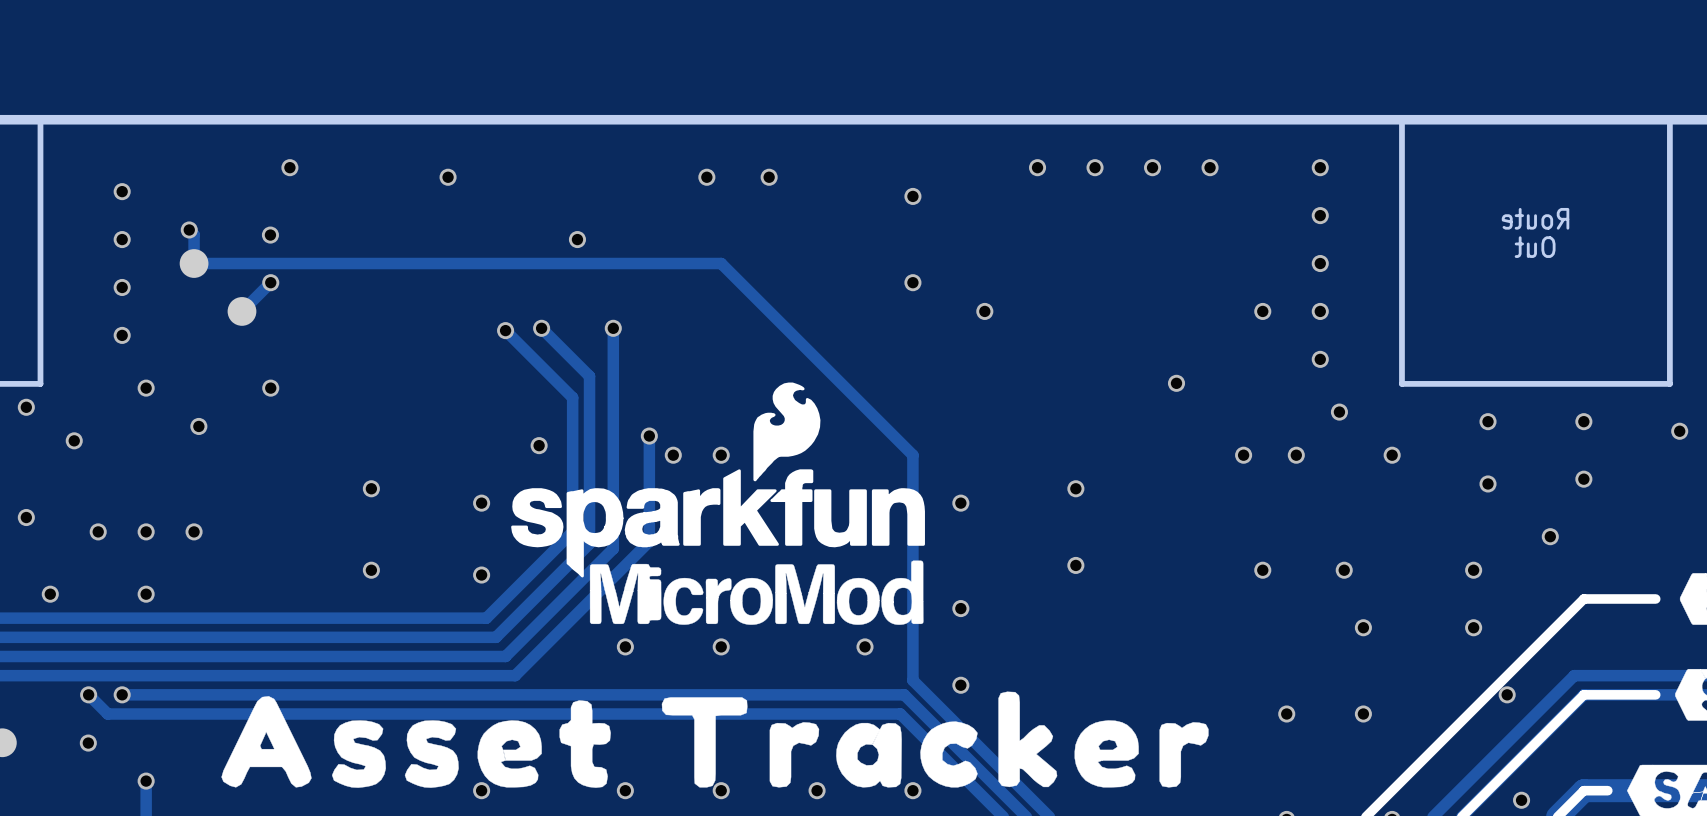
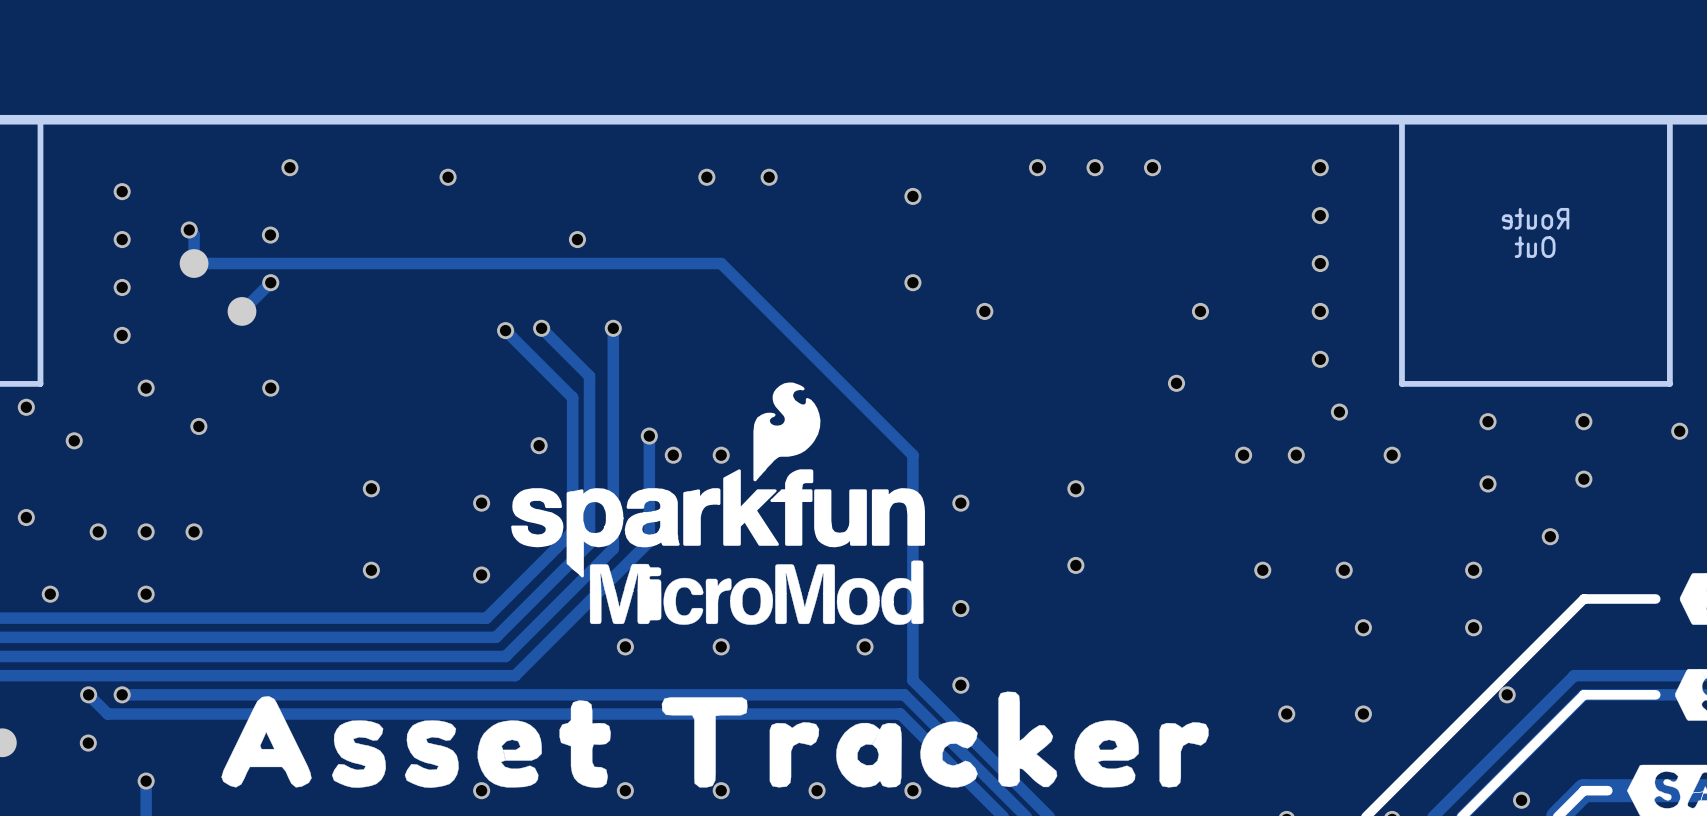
via: (1210, 167) -> none
via position: (1262, 311) -> (1200, 311)

